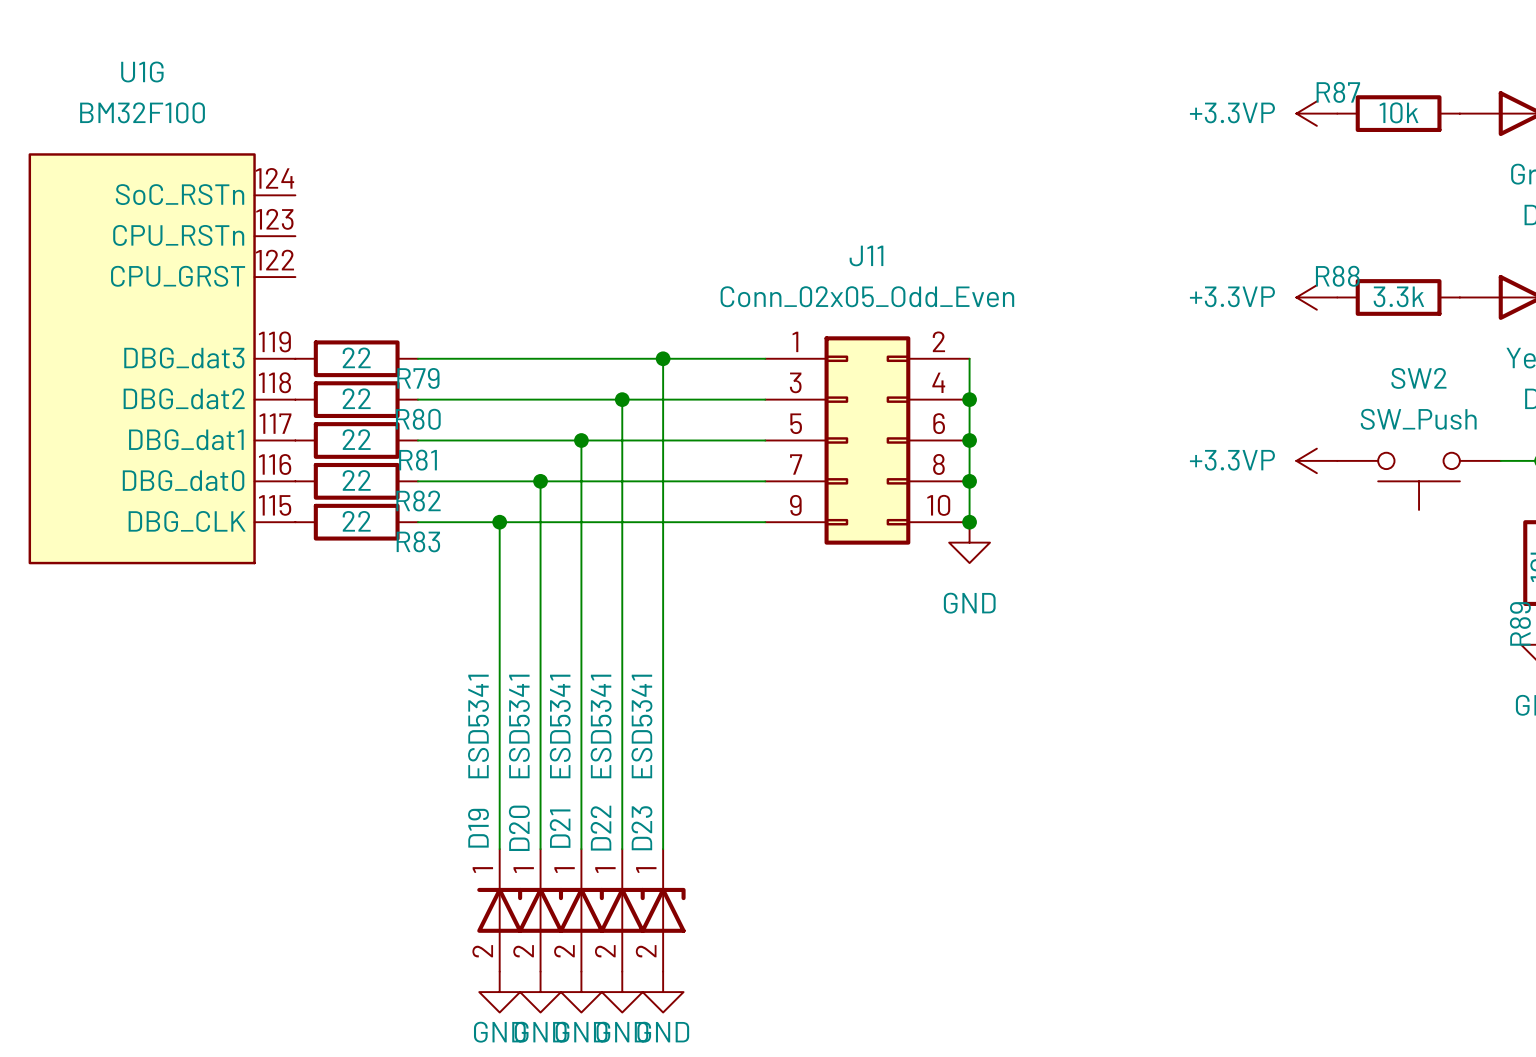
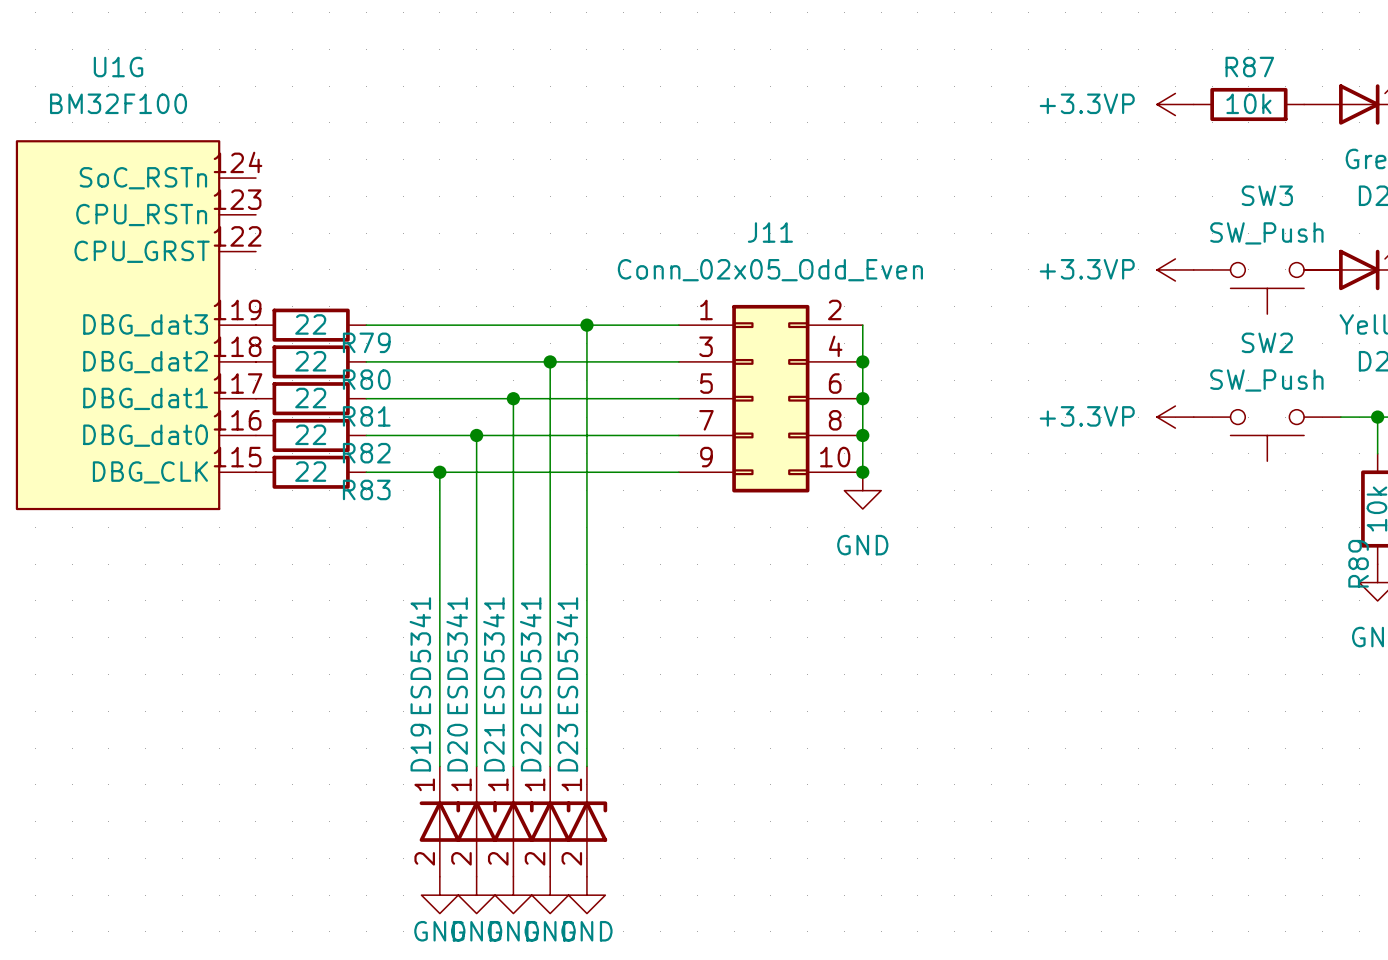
R87 name position: R87 (1338, 92) -> R87 (1249, 67)
R88: 3.3k (1398, 297) -> none
SW3: none -> SW_Push (1267, 288)

